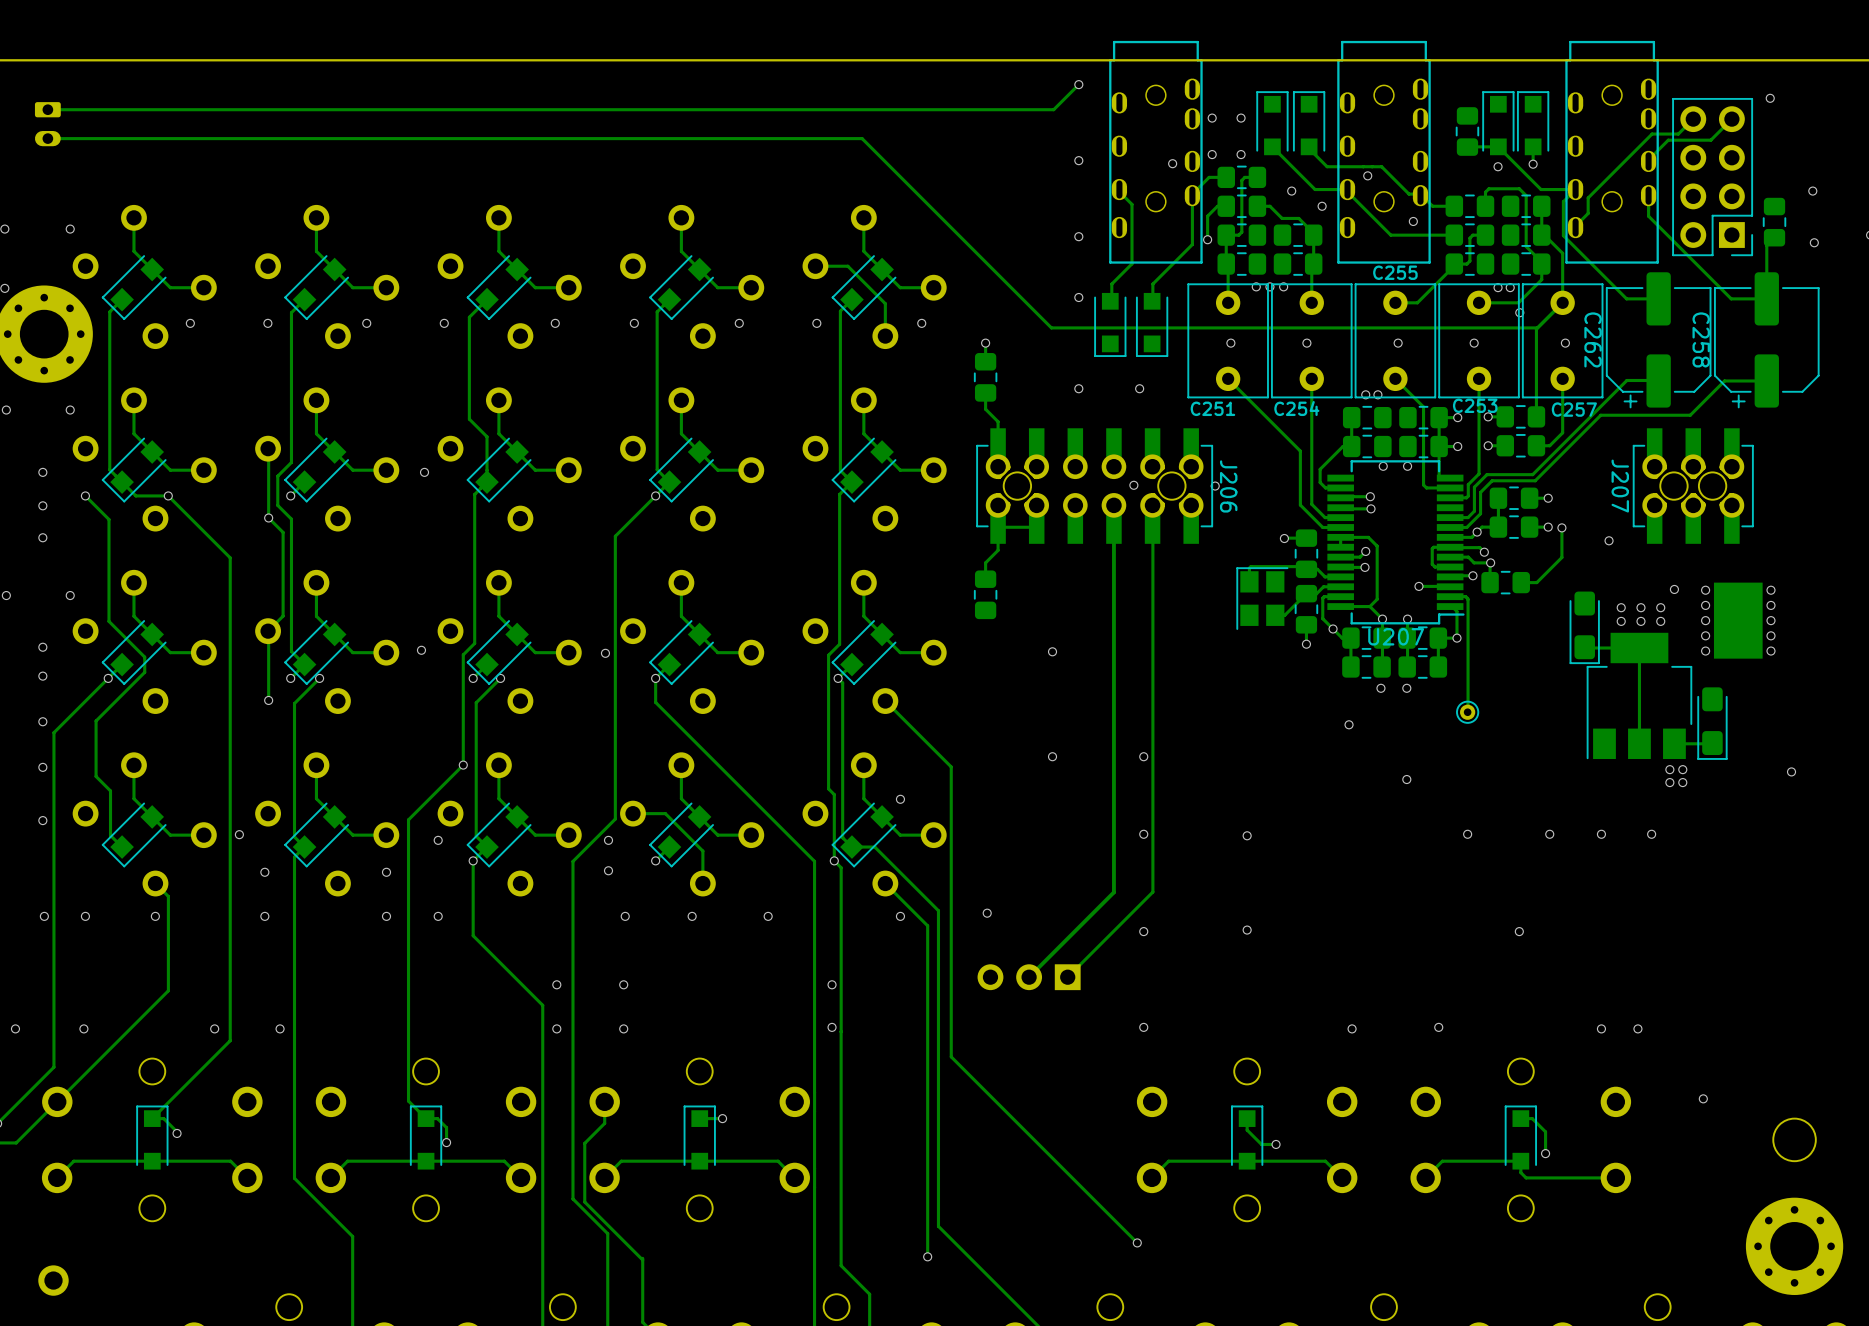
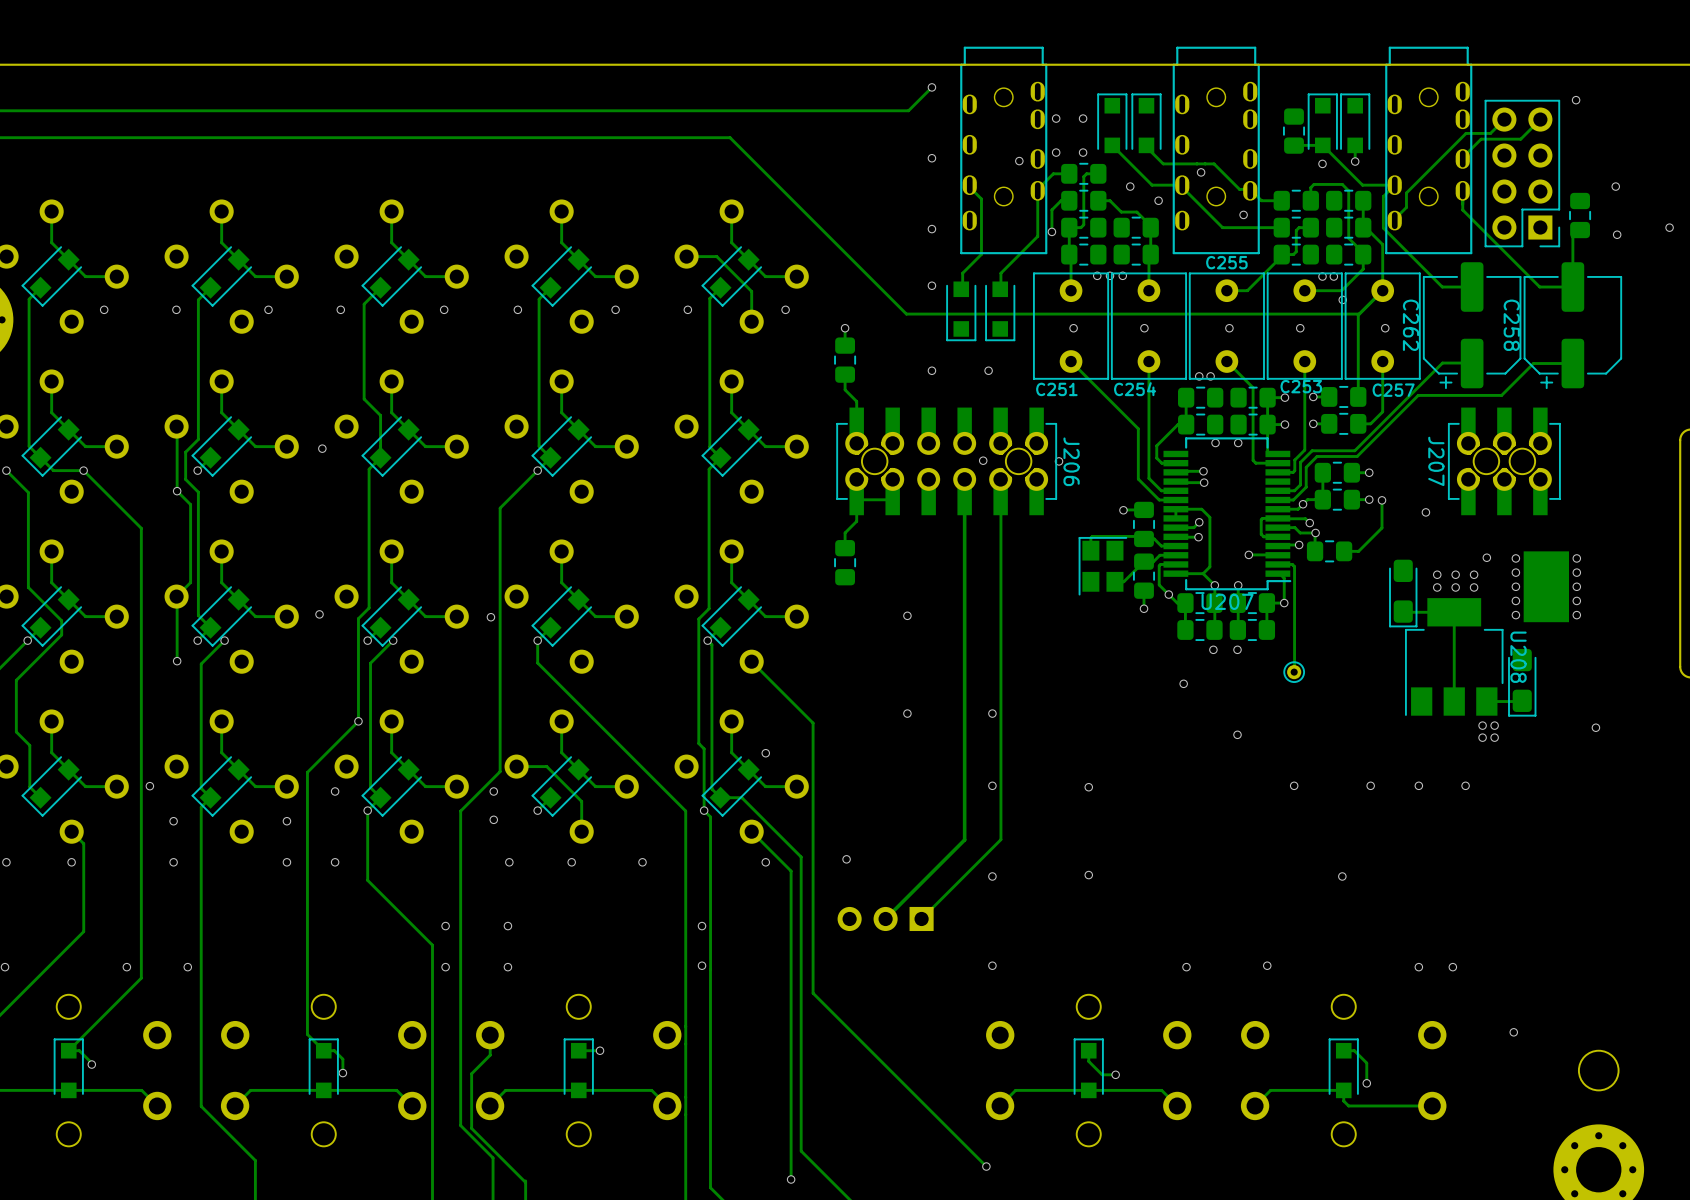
U208 name: none -> U208 (1518, 657)

